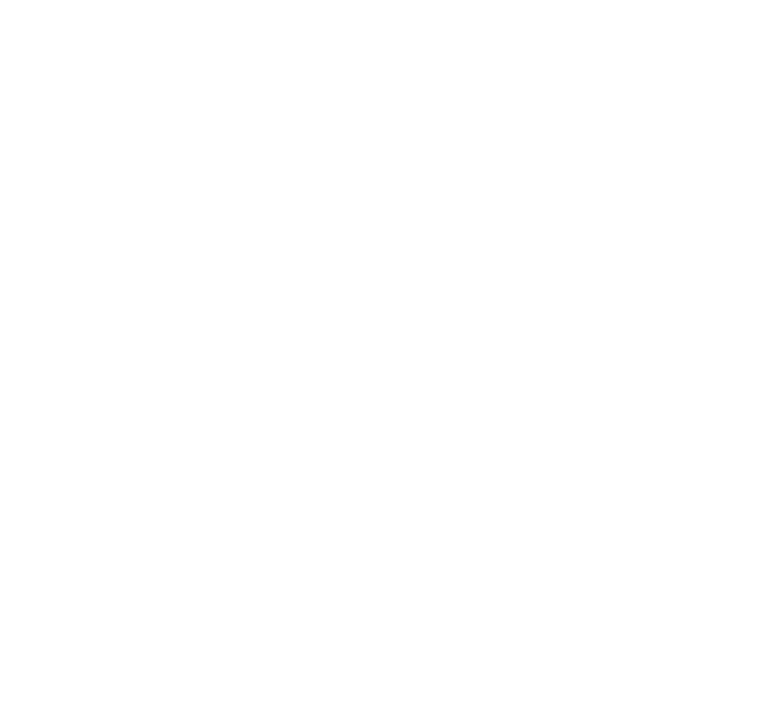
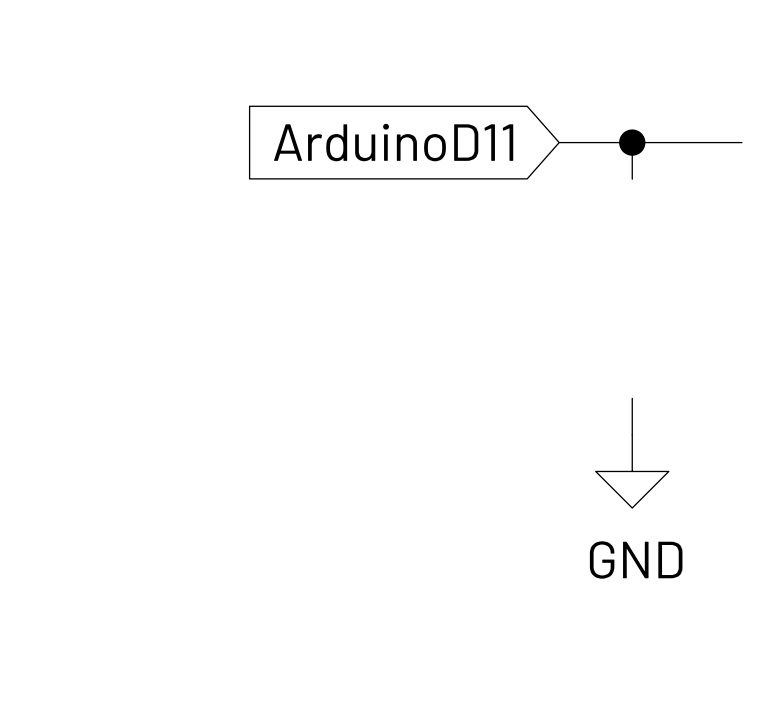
global label: none -> ArduinoD11 (393, 142)
wire: none -> (559, 142) (741, 142)
wire: none -> (632, 142) (632, 179)
junction: none -> (632, 142)
wire: none -> (632, 398) (632, 434)
power symbol: none -> GND (632, 471)

